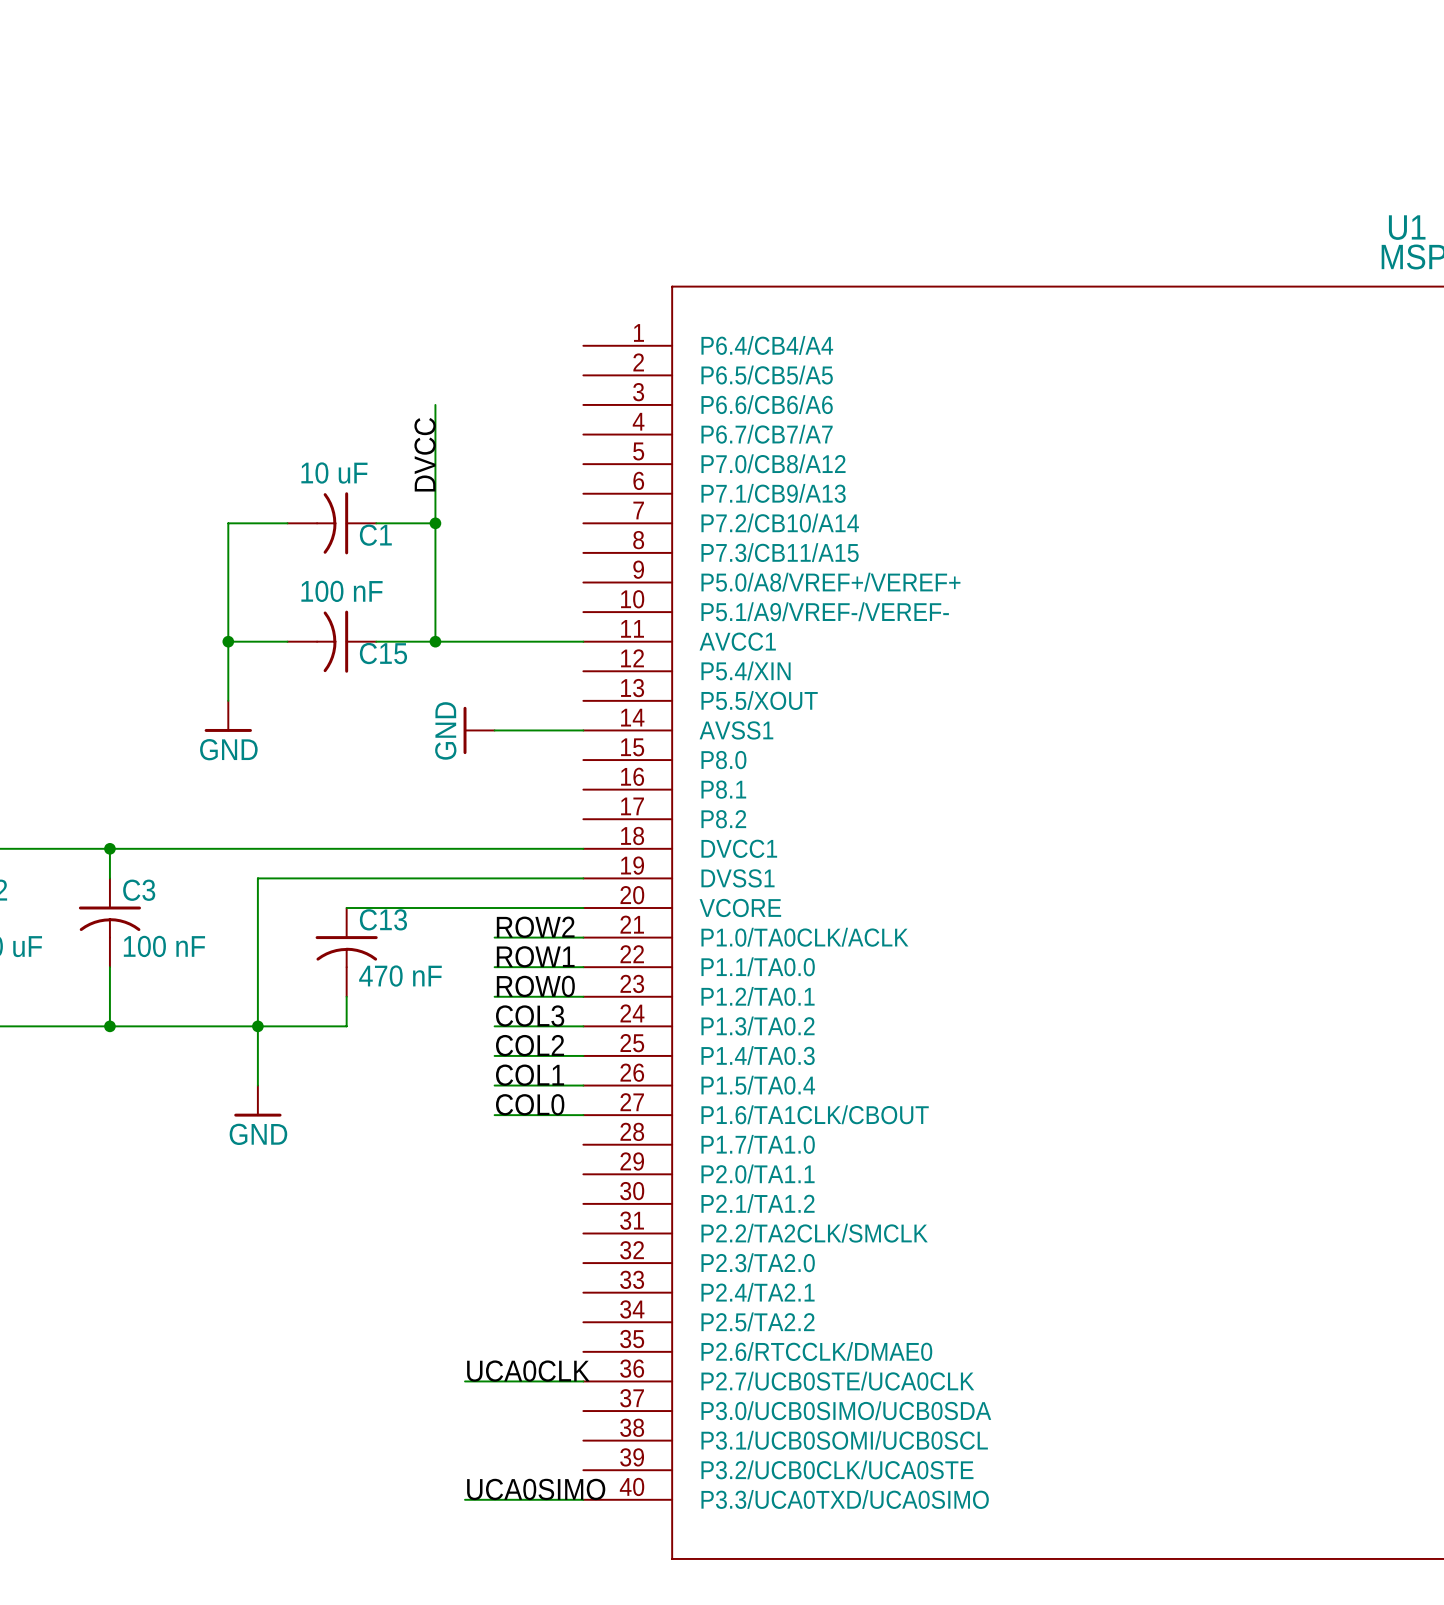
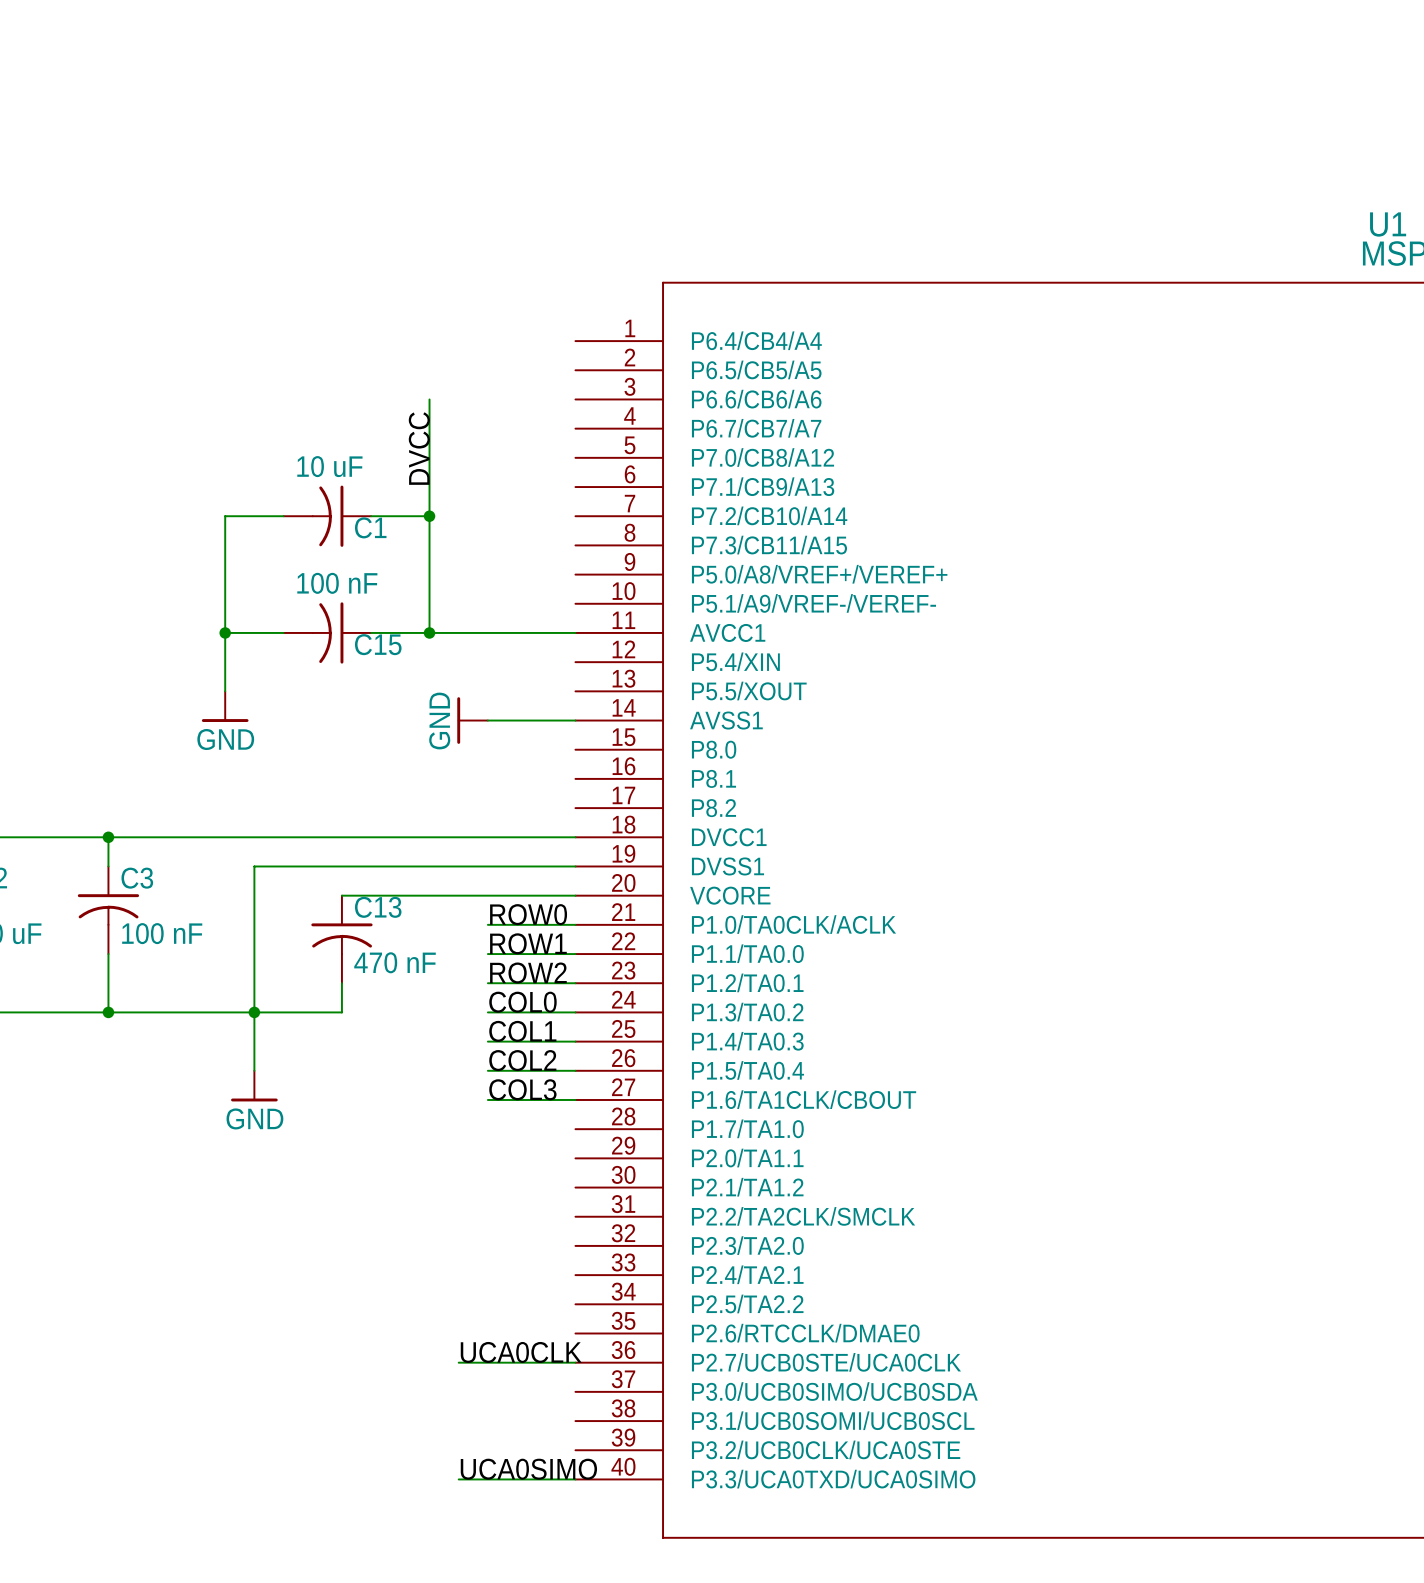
label: ROW2 (535, 927) -> ROW0 (528, 914)
label: ROW0 (535, 986) -> ROW2 (528, 973)
label: COL3 (530, 1015) -> COL0 (522, 1002)
label: COL2 (530, 1045) -> COL1 (522, 1031)
label: COL1 (530, 1075) -> COL2 (522, 1060)
label: COL0 (530, 1104) -> COL3 (522, 1089)

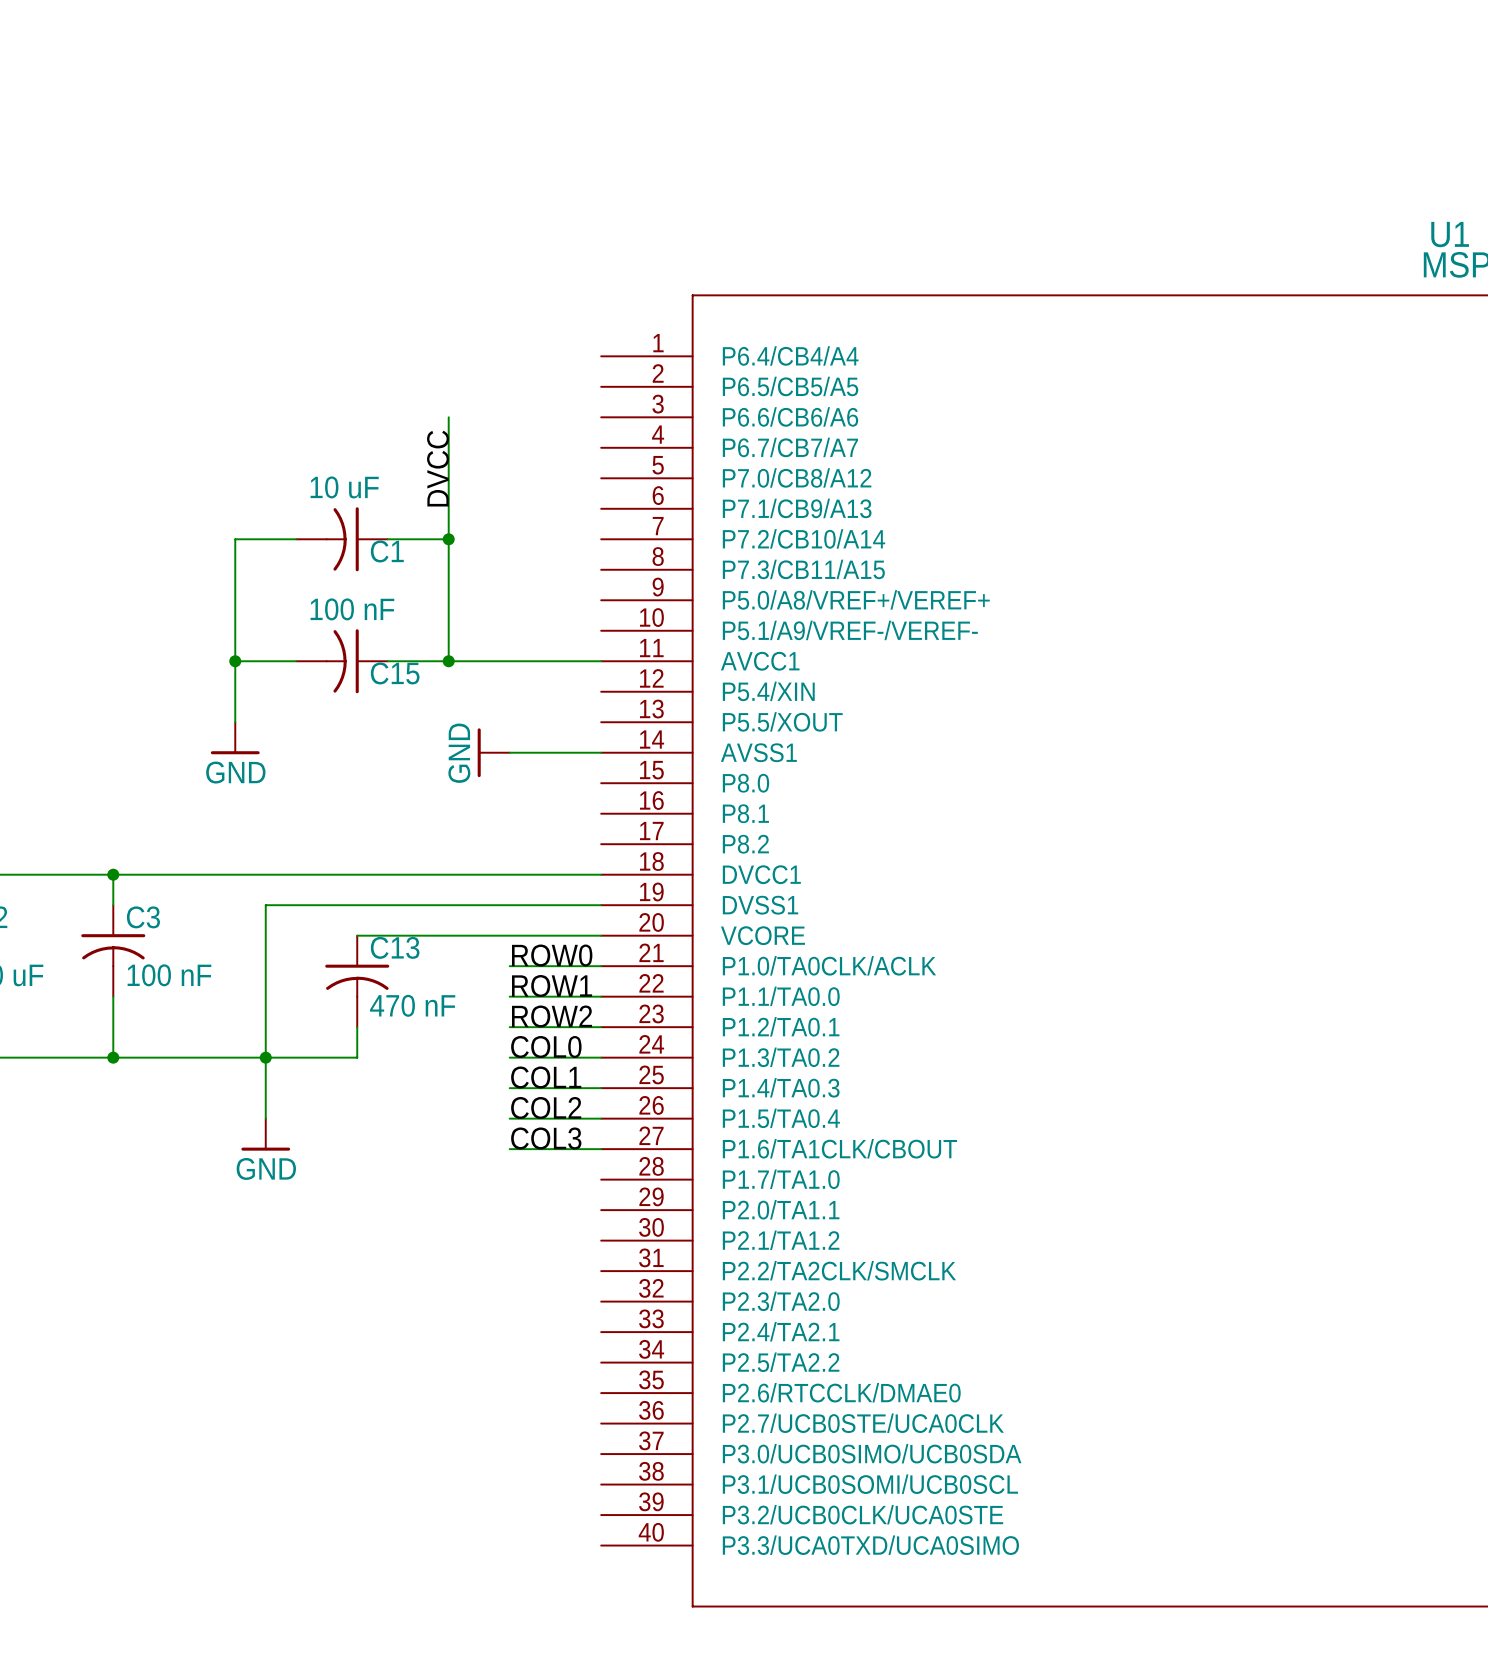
label: UCA0CLK (521, 1352) -> none
wire: (458, 1362) (575, 1362) -> none
label: UCA0SIMO (528, 1469) -> none
wire: (458, 1479) (575, 1479) -> none

